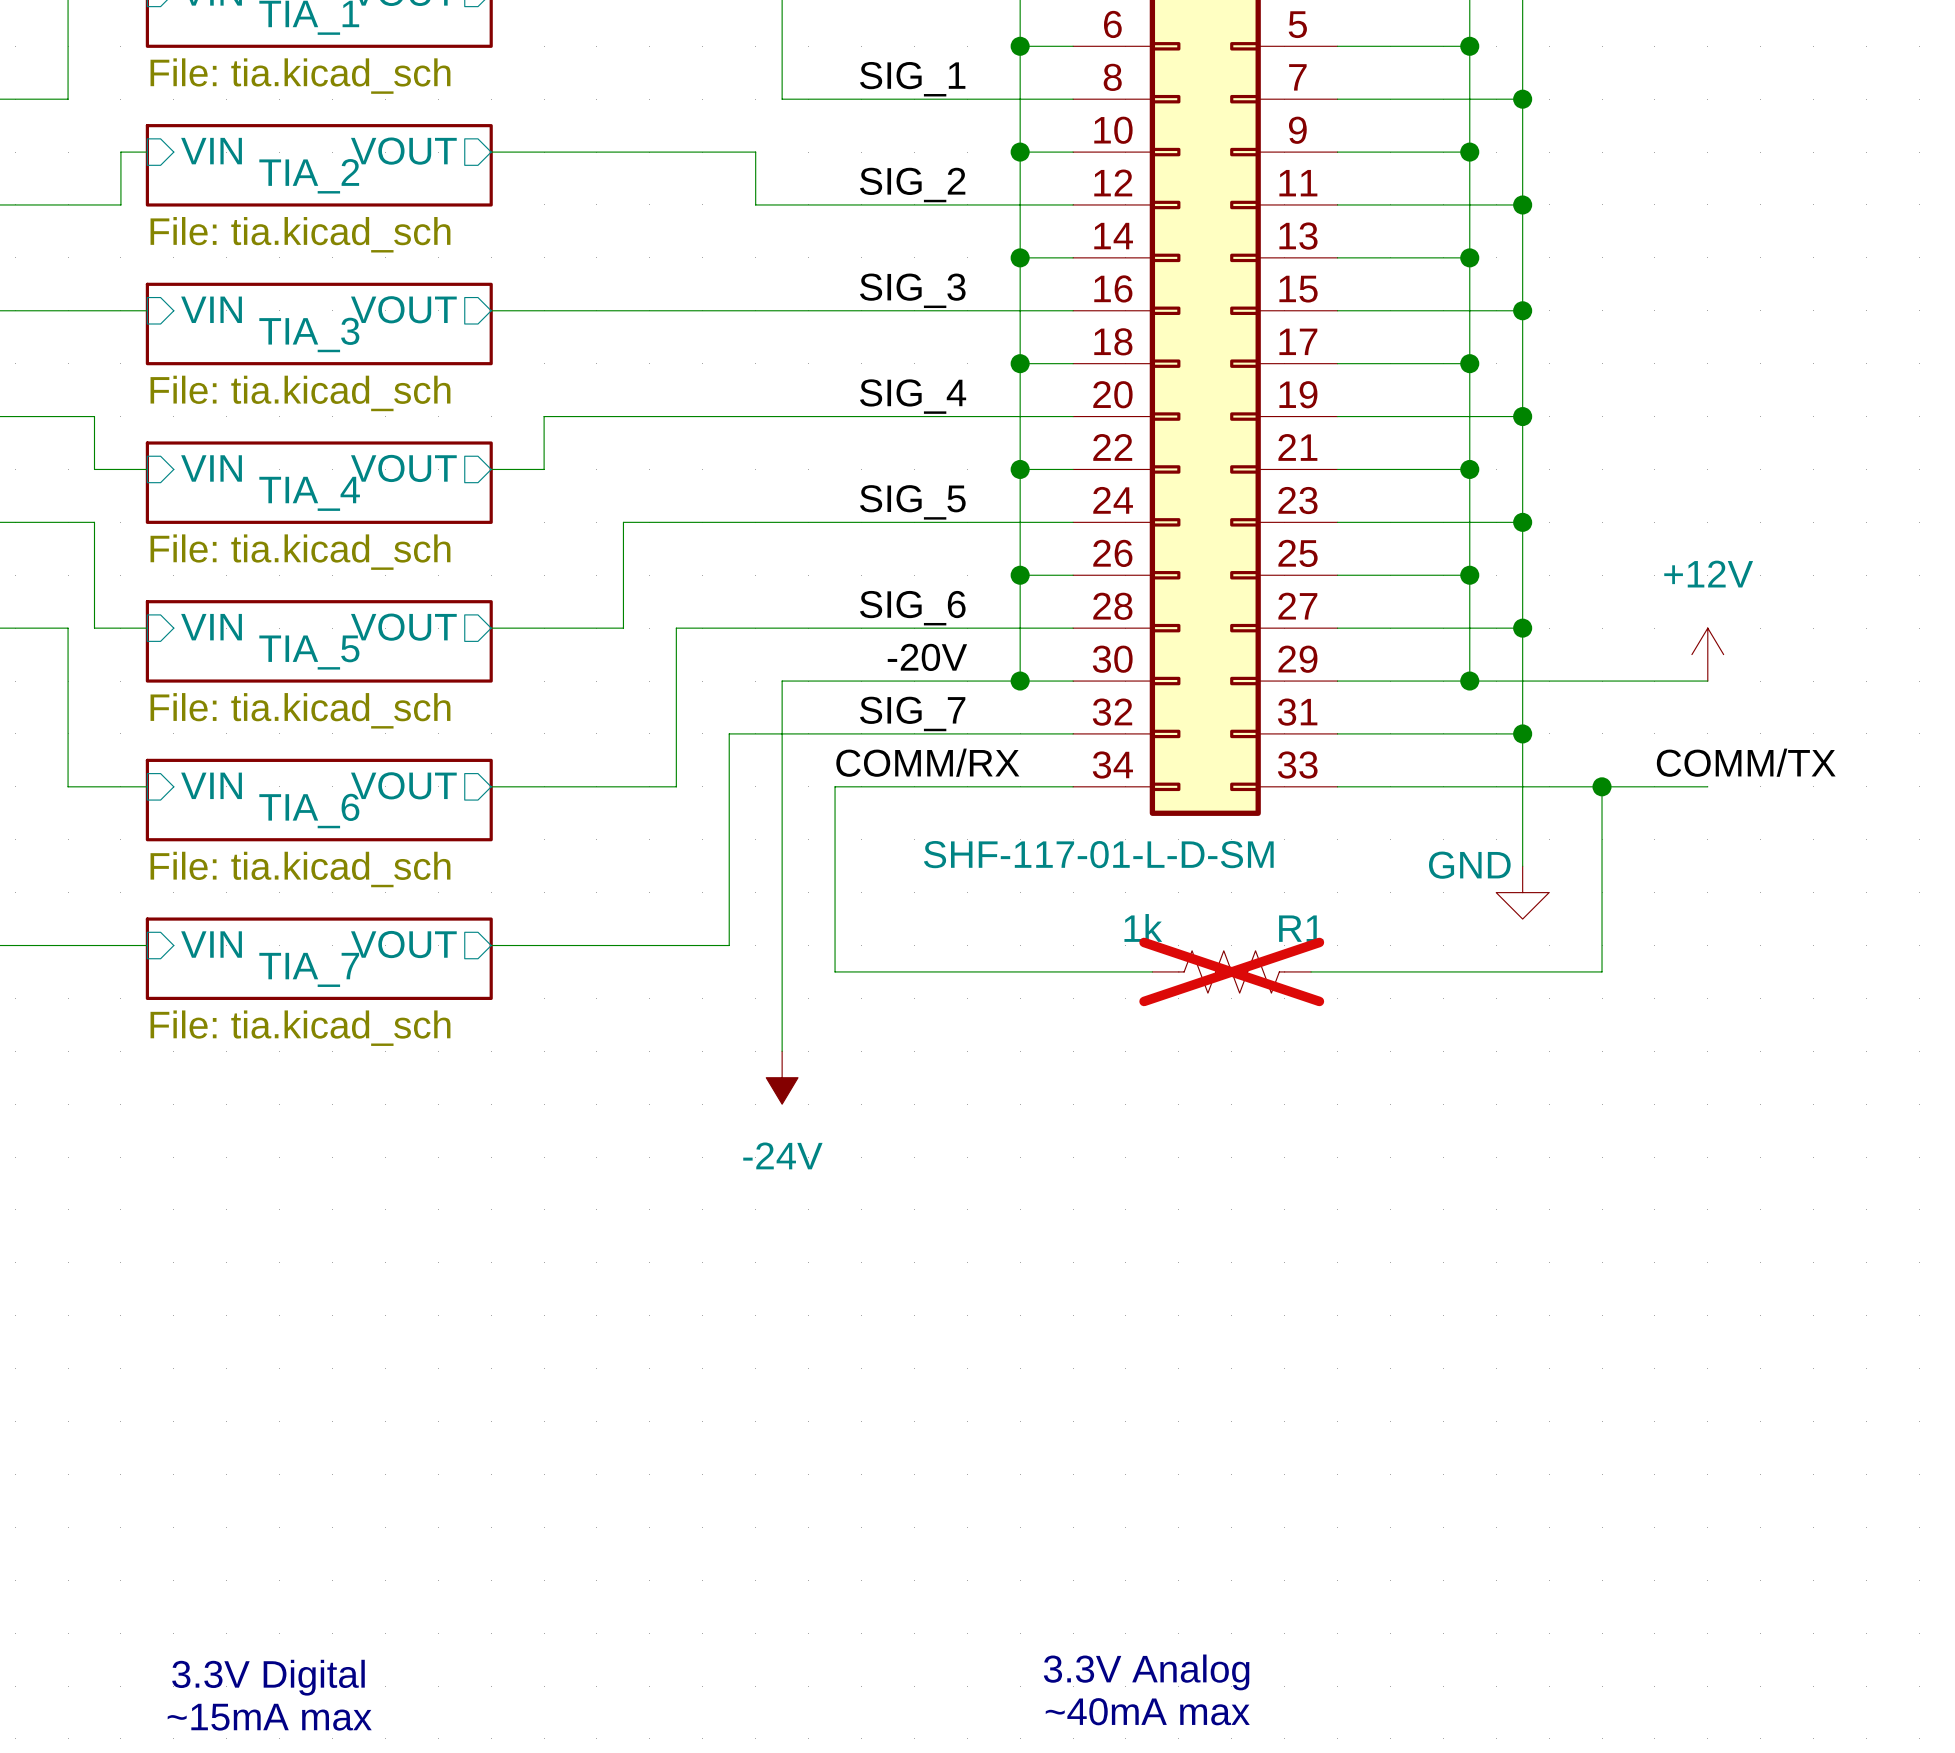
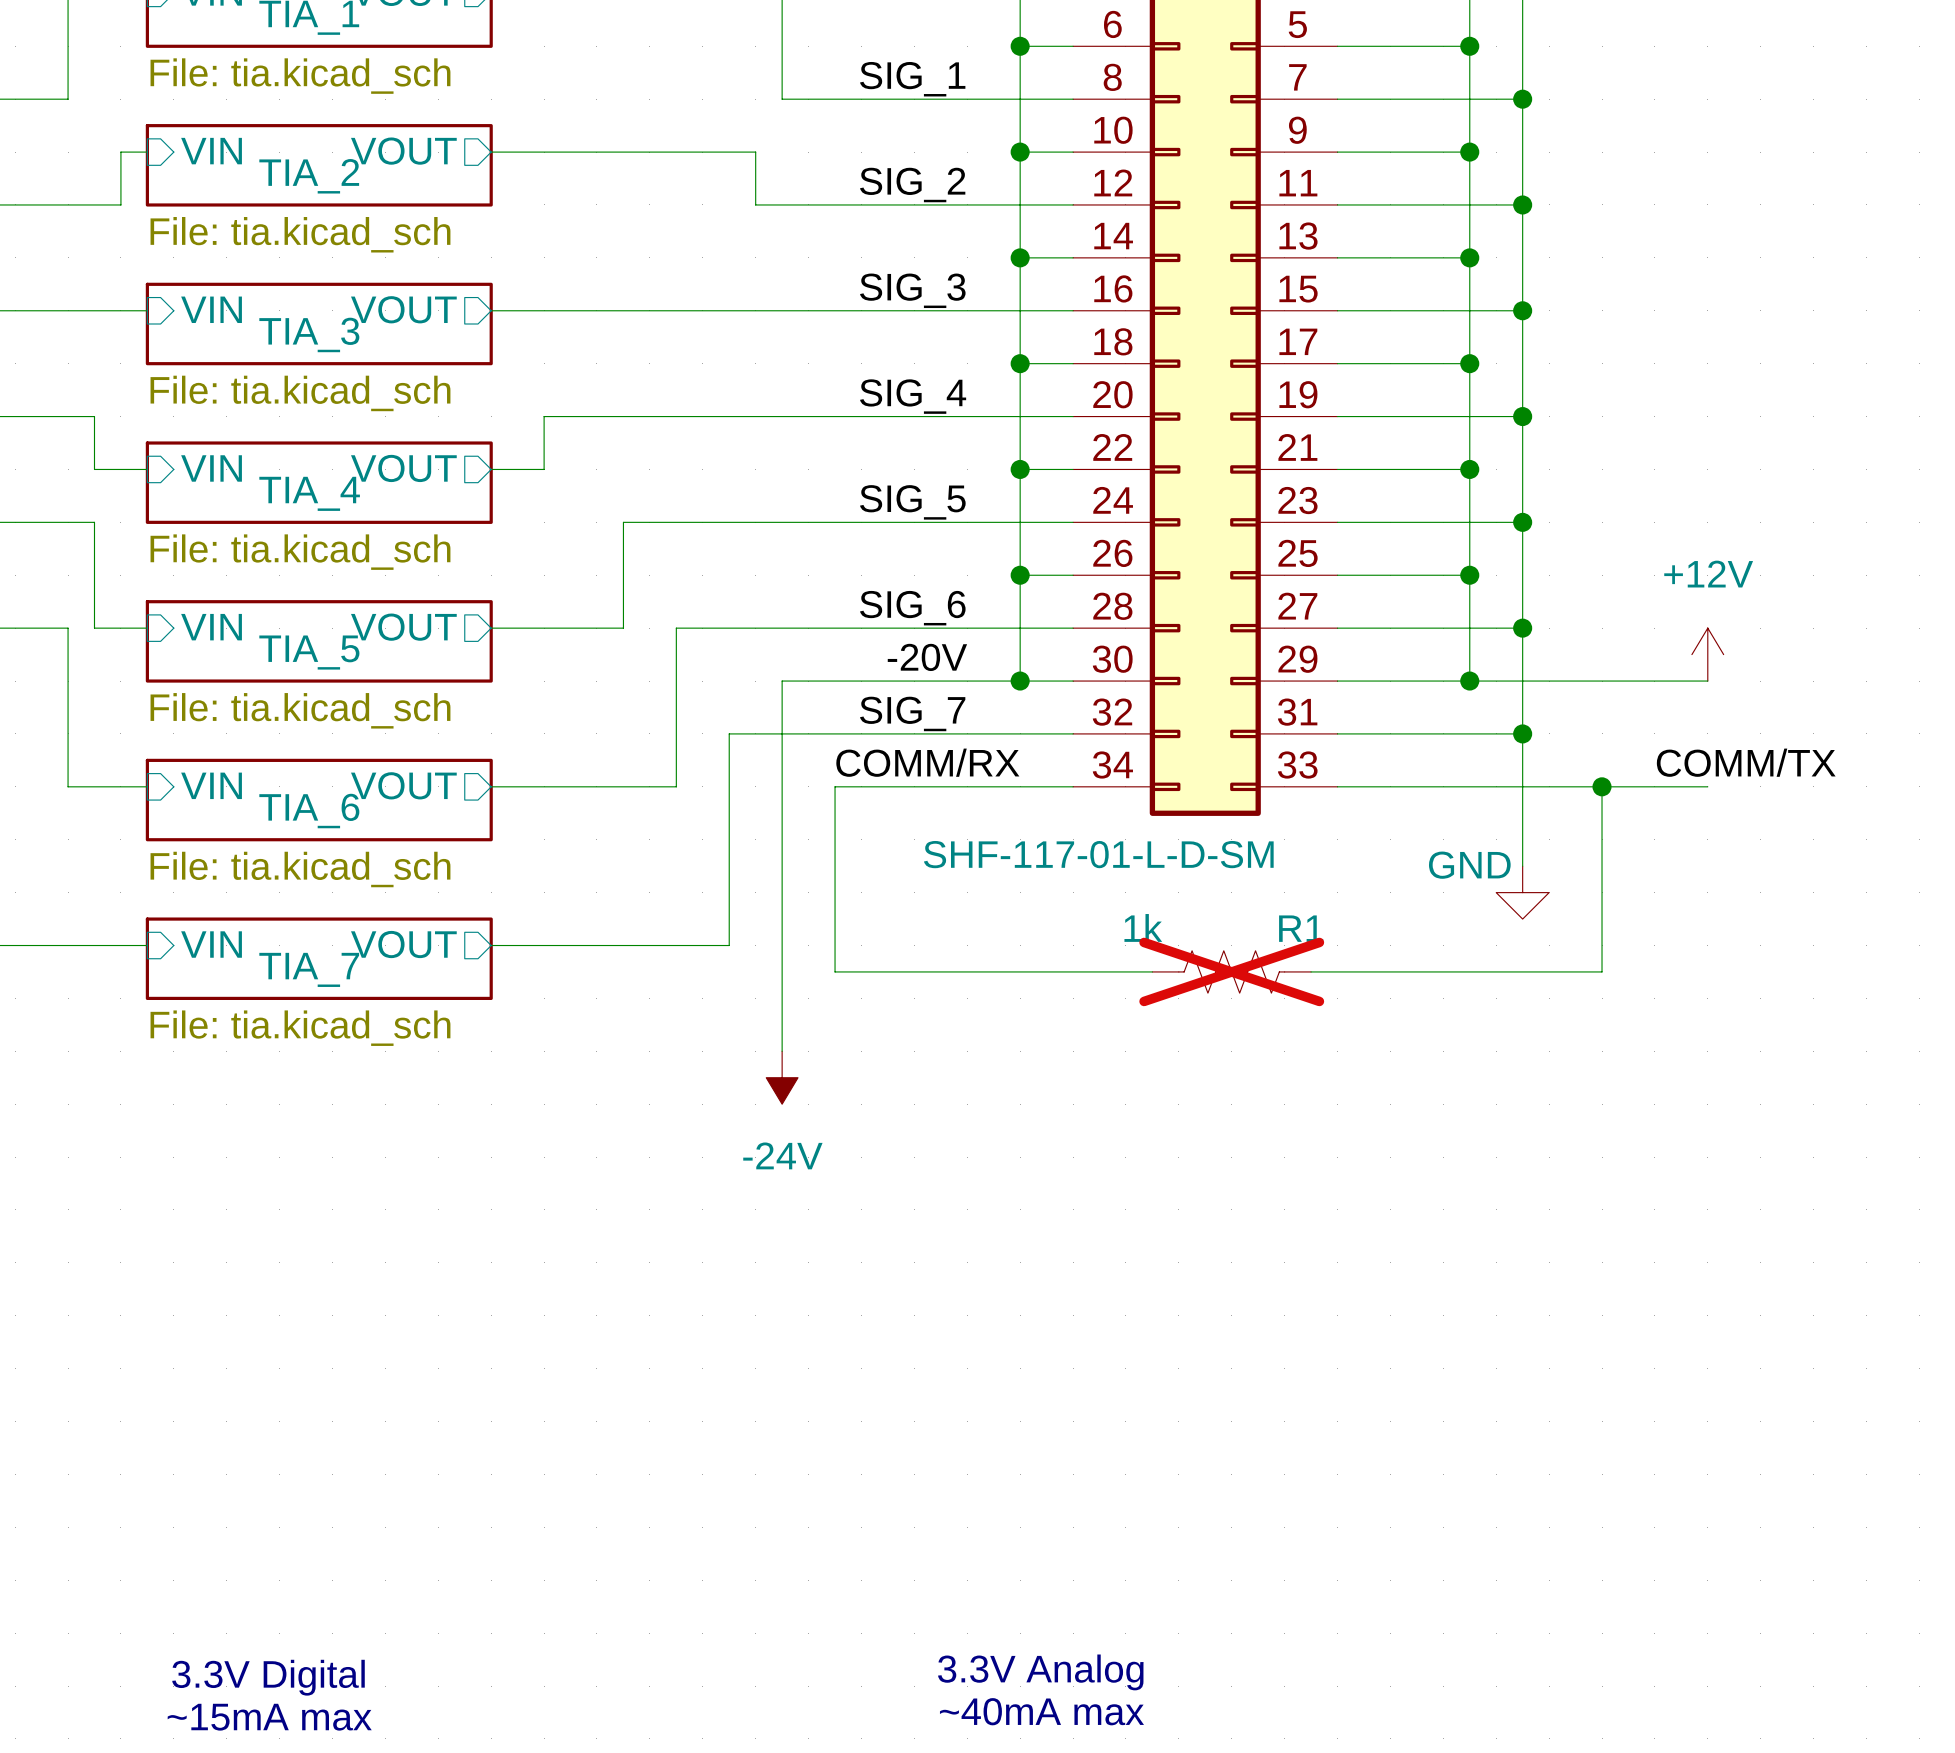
text position: 3.3V Analog (1146, 1672) -> 3.3V Analog (1040, 1672)
text position: ~40mA max (1147, 1711) -> ~40mA max (1041, 1711)

